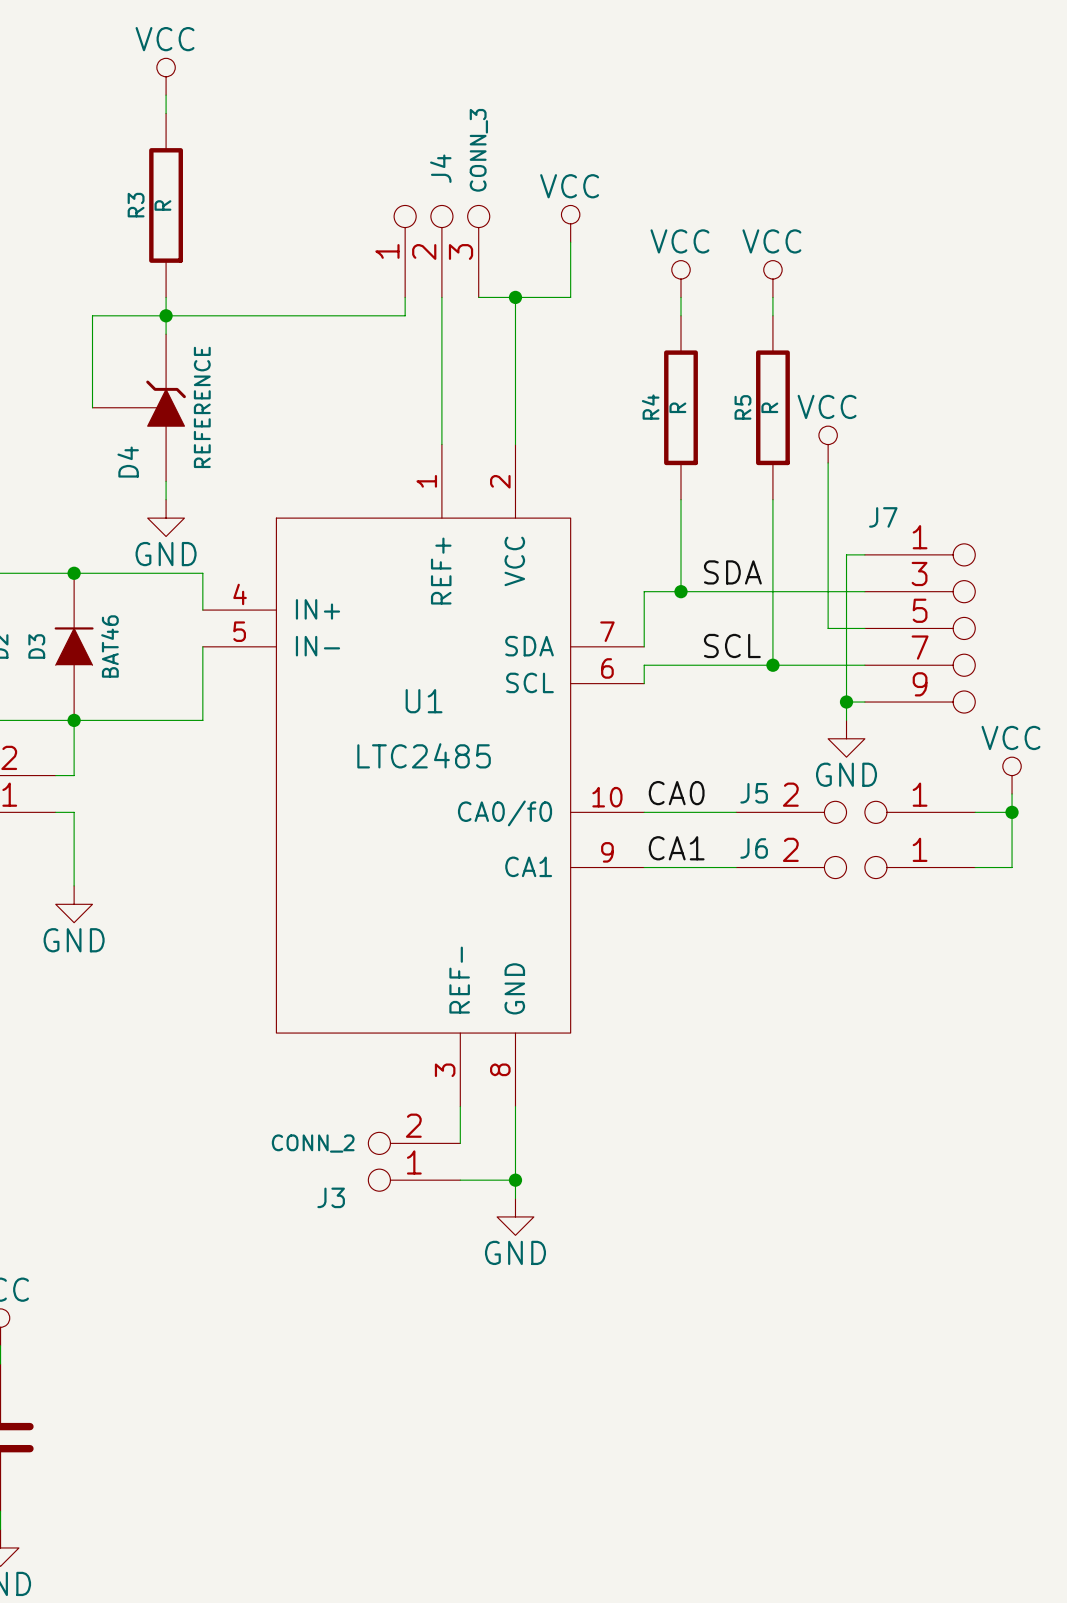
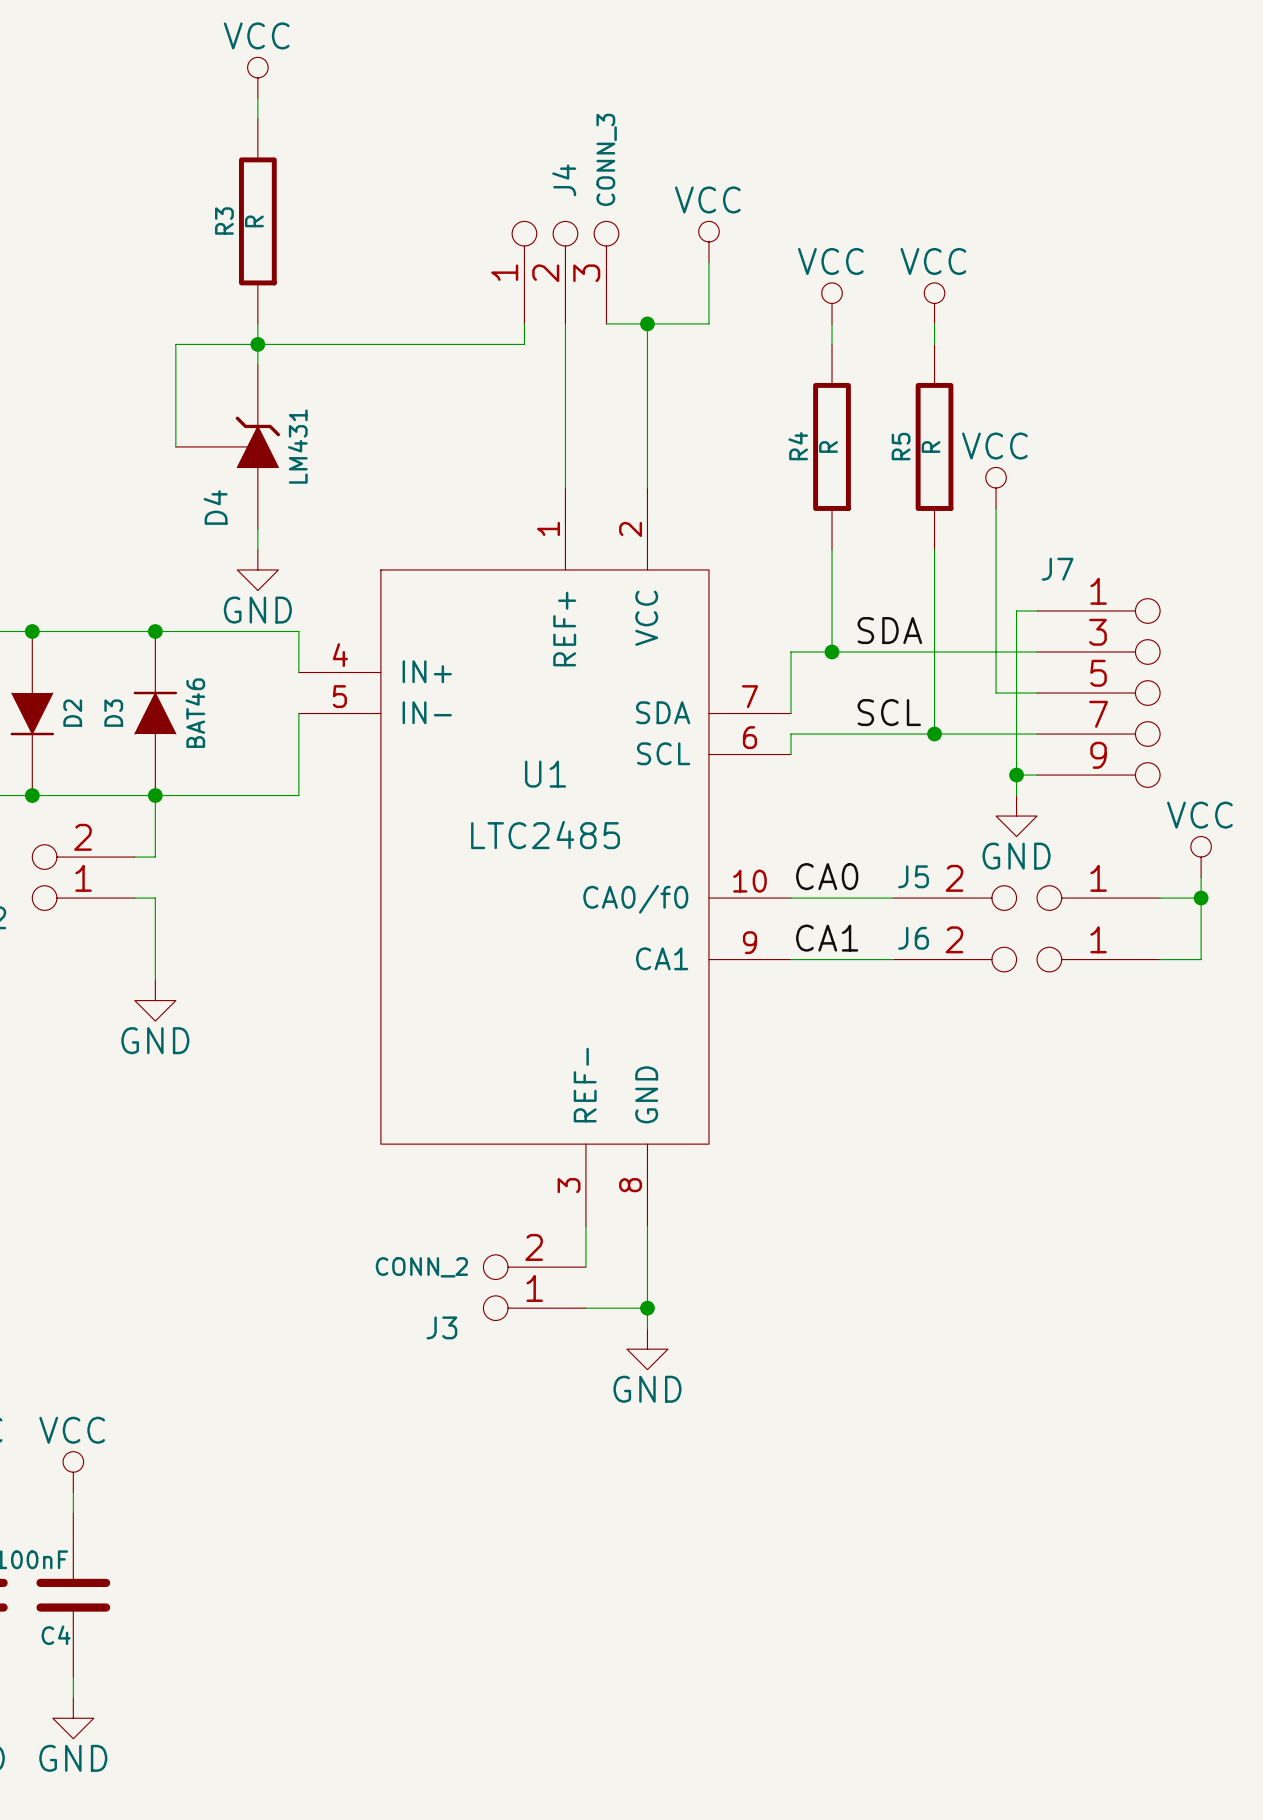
D4 value: REFERENCE (202, 407) -> LM431 (297, 446)

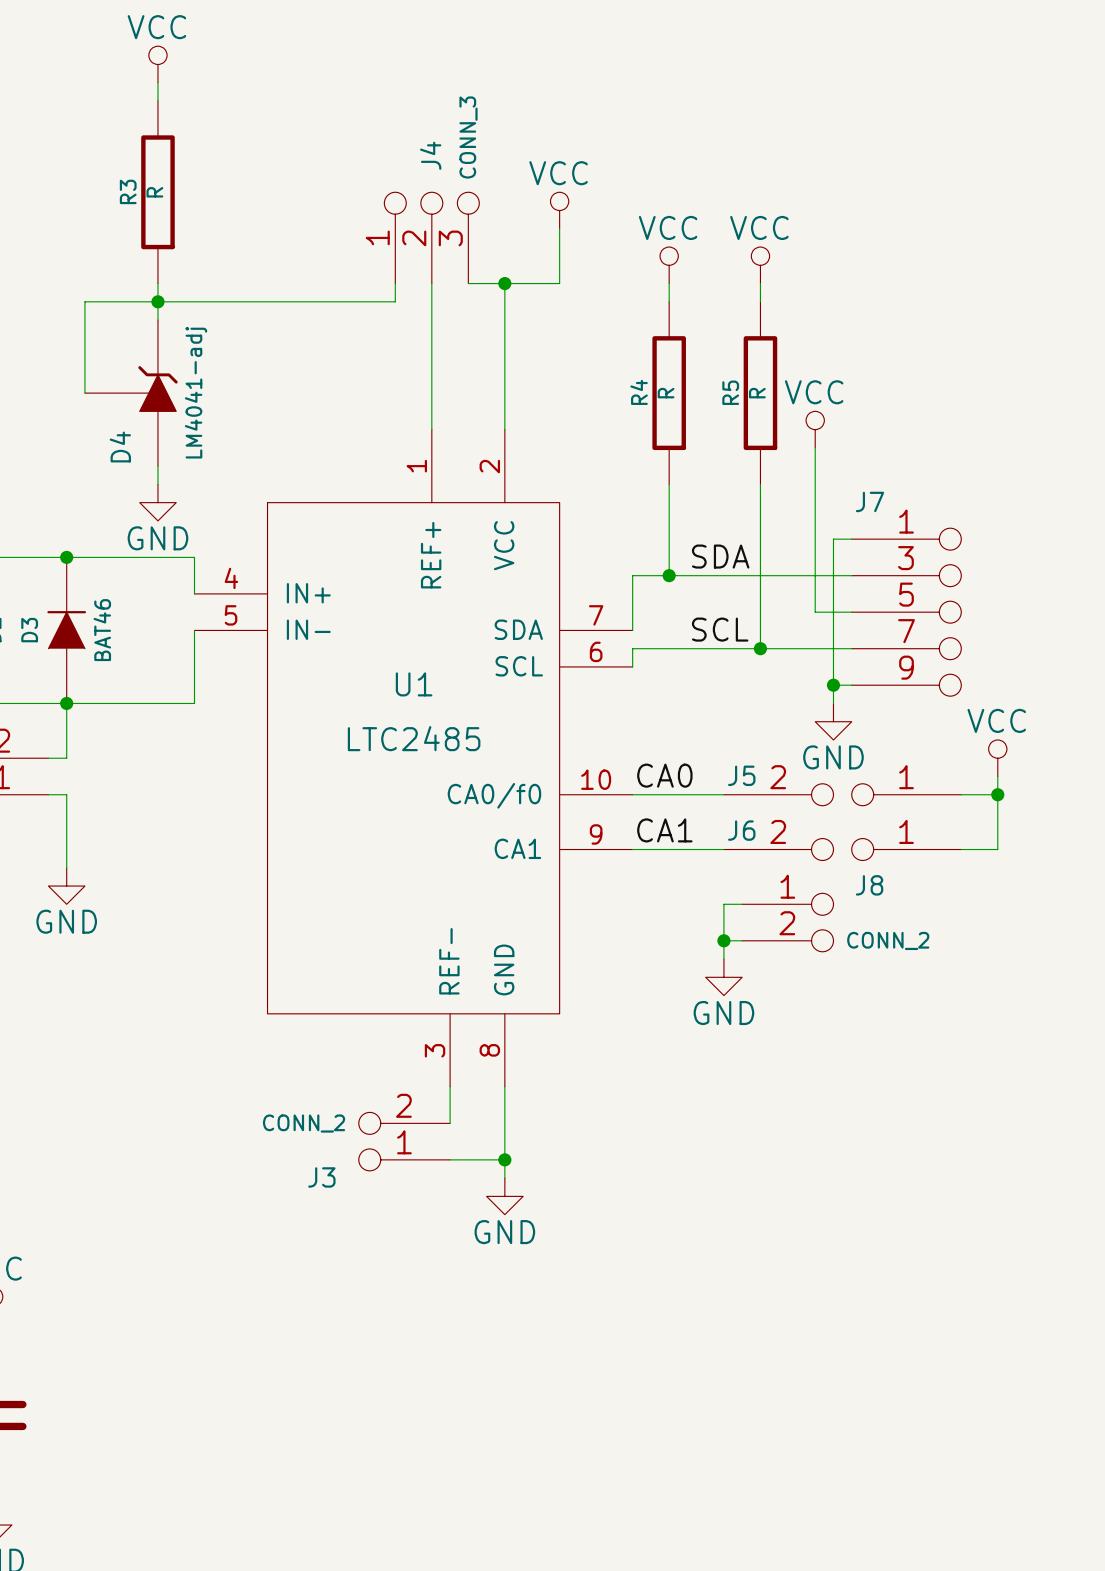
D4 value: LM431 (297, 446) -> LM4041-adj (196, 392)
wire: none -> (742, 904) (723, 904) (723, 959)
J8: none -> CONN_2 (787, 922)
wire: none -> (723, 940) (742, 940)
junction: none -> (723, 940)
power symbol: none -> GND (723, 977)

